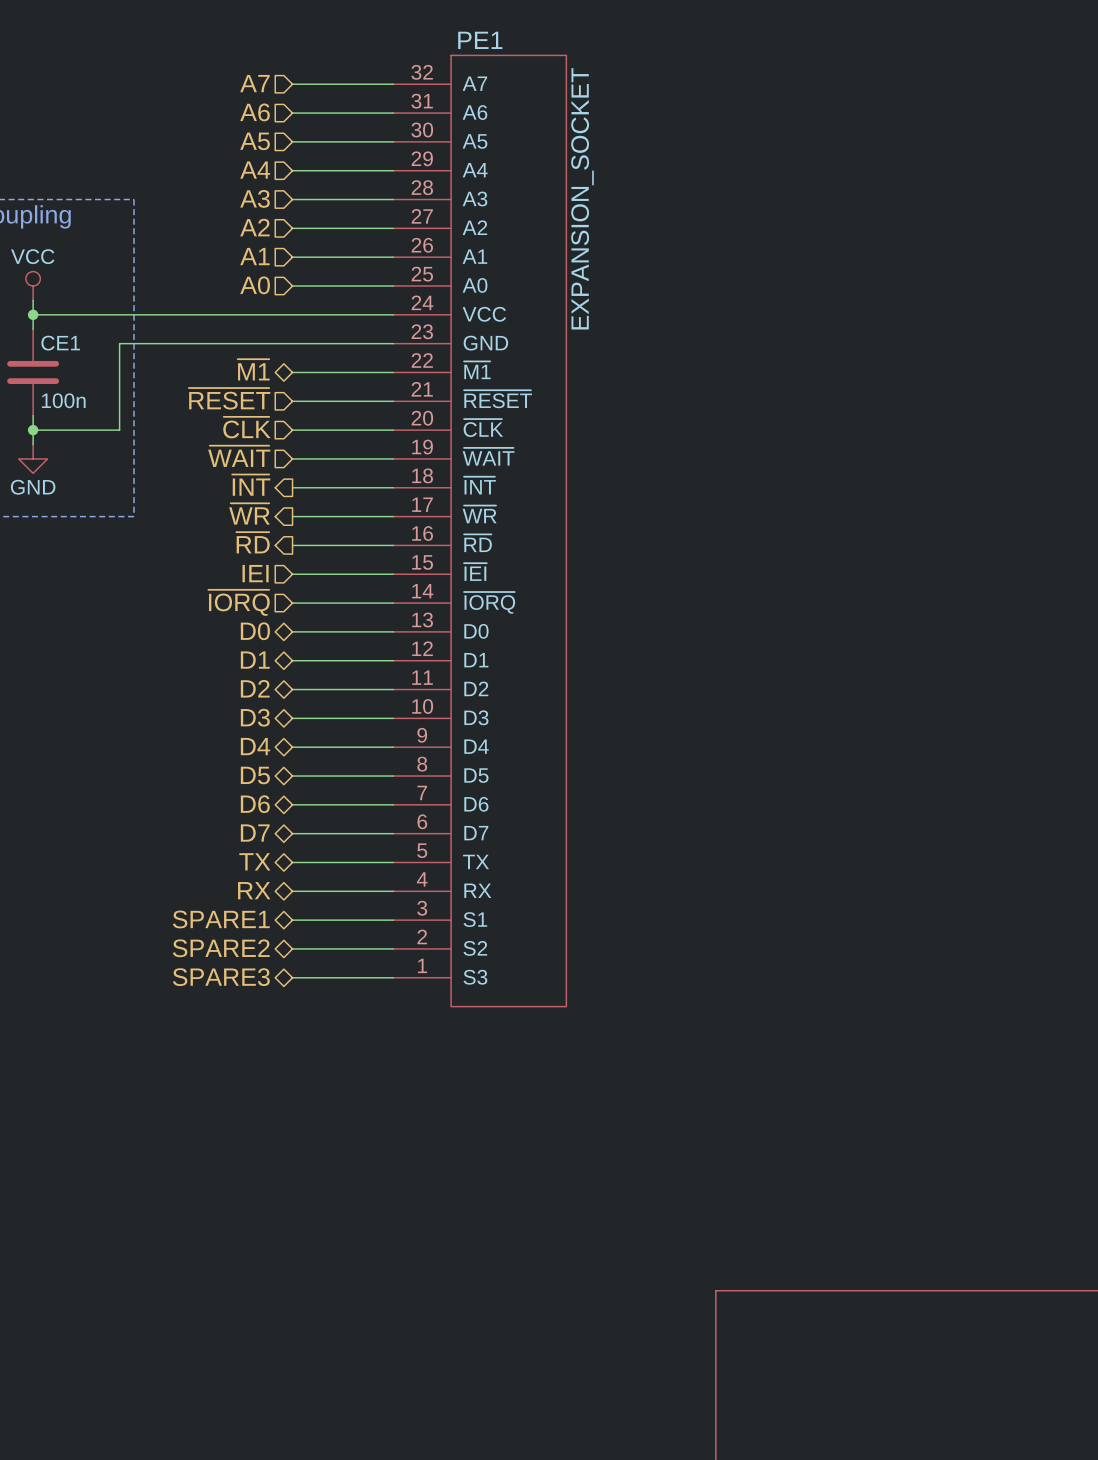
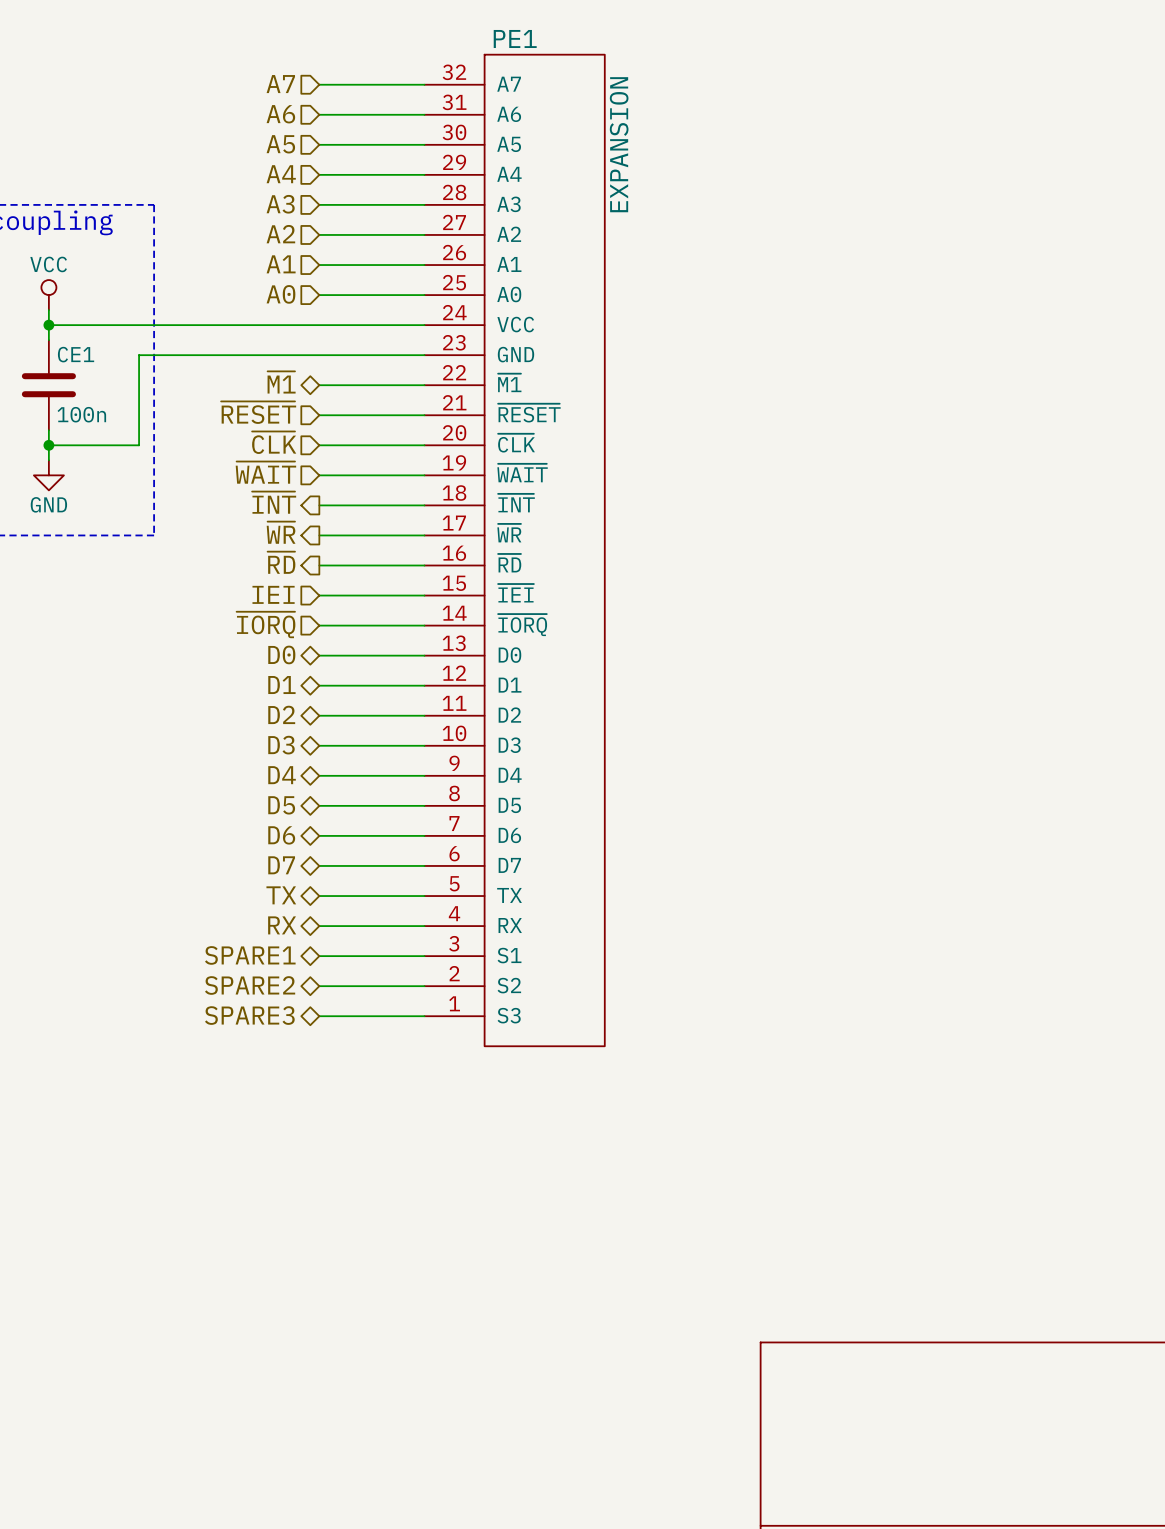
PE1 value: EXPANSION_SOCKET (582, 198) -> EXPANSION (619, 144)

